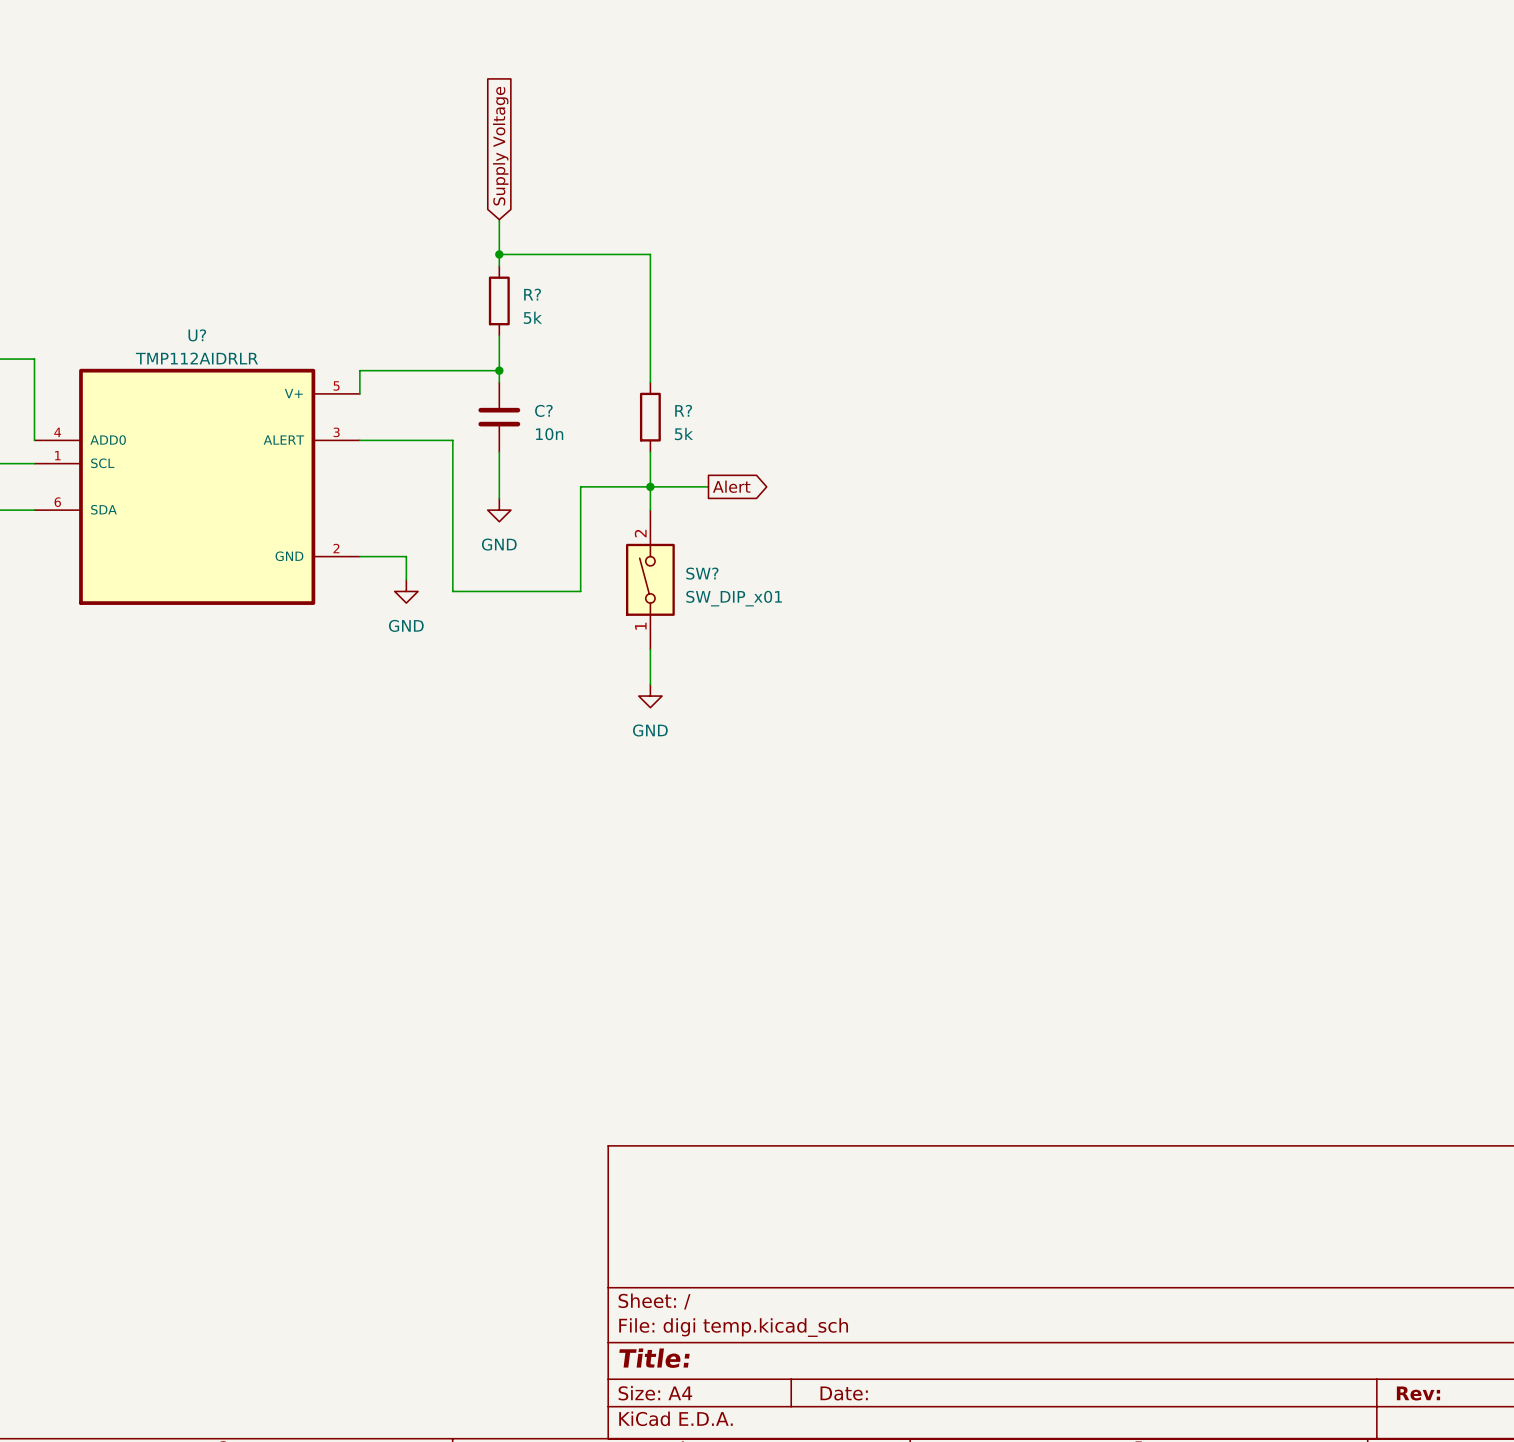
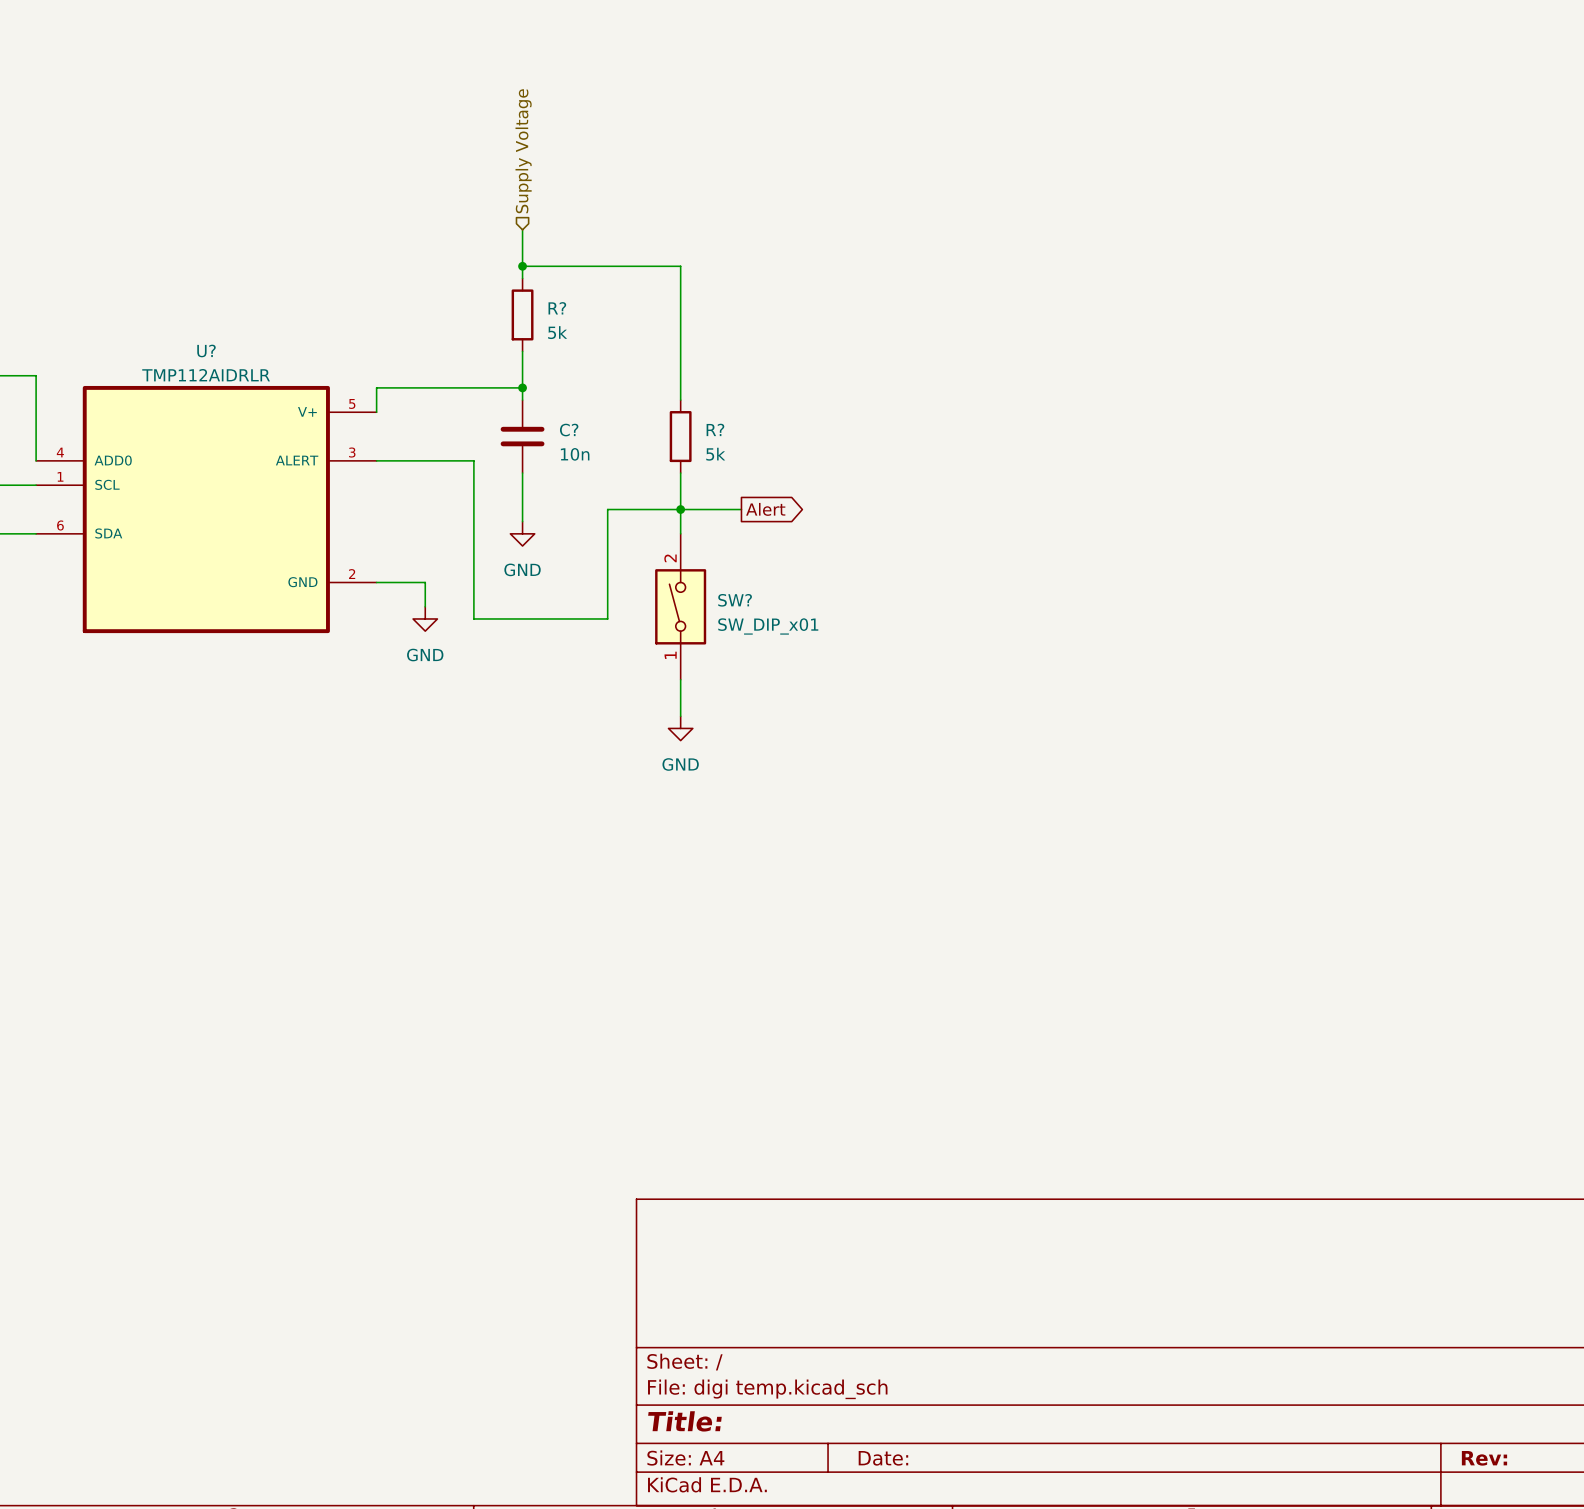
hierarchical label: none -> Supply Voltage (523, 151)
global label: Supply Voltage (500, 146) -> none

